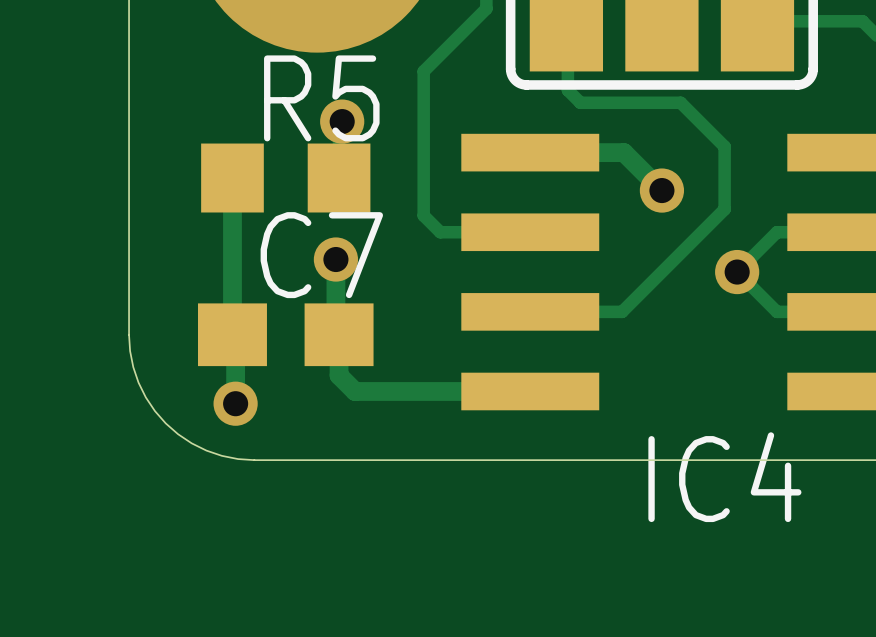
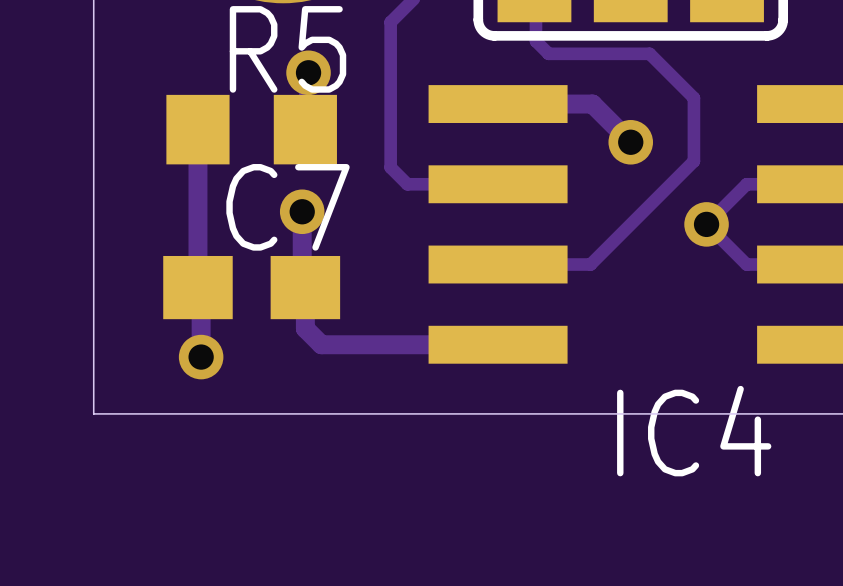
board edge: (129, 334) (133, 367) (138, 382) (145, 397) (165, 423) (191, 443) (206, 450) (221, 455) (254, 460) -> (93, 287) (93, 413) (220, 413)

